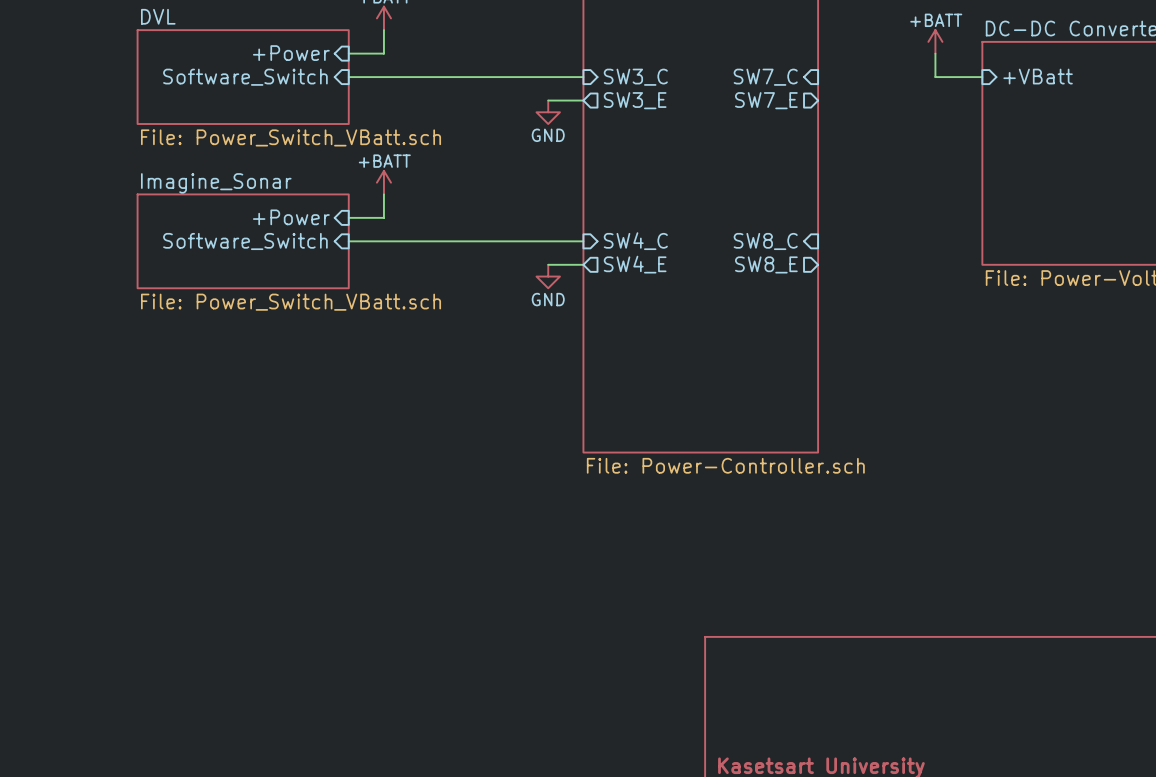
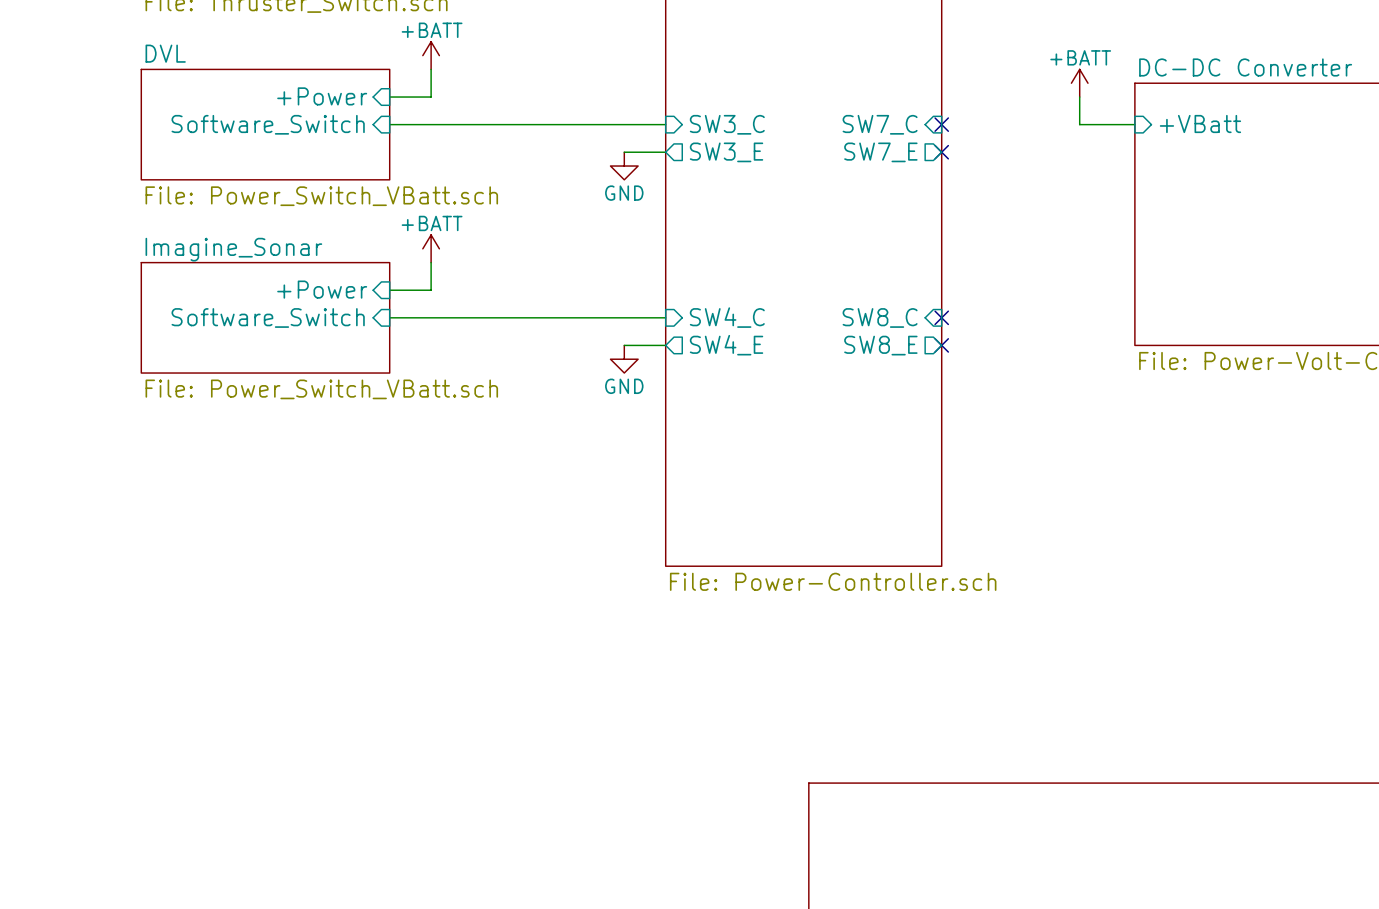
no-connect mark: none -> (941, 124)
no-connect mark: none -> (941, 152)
no-connect mark: none -> (941, 317)
no-connect mark: none -> (941, 345)

